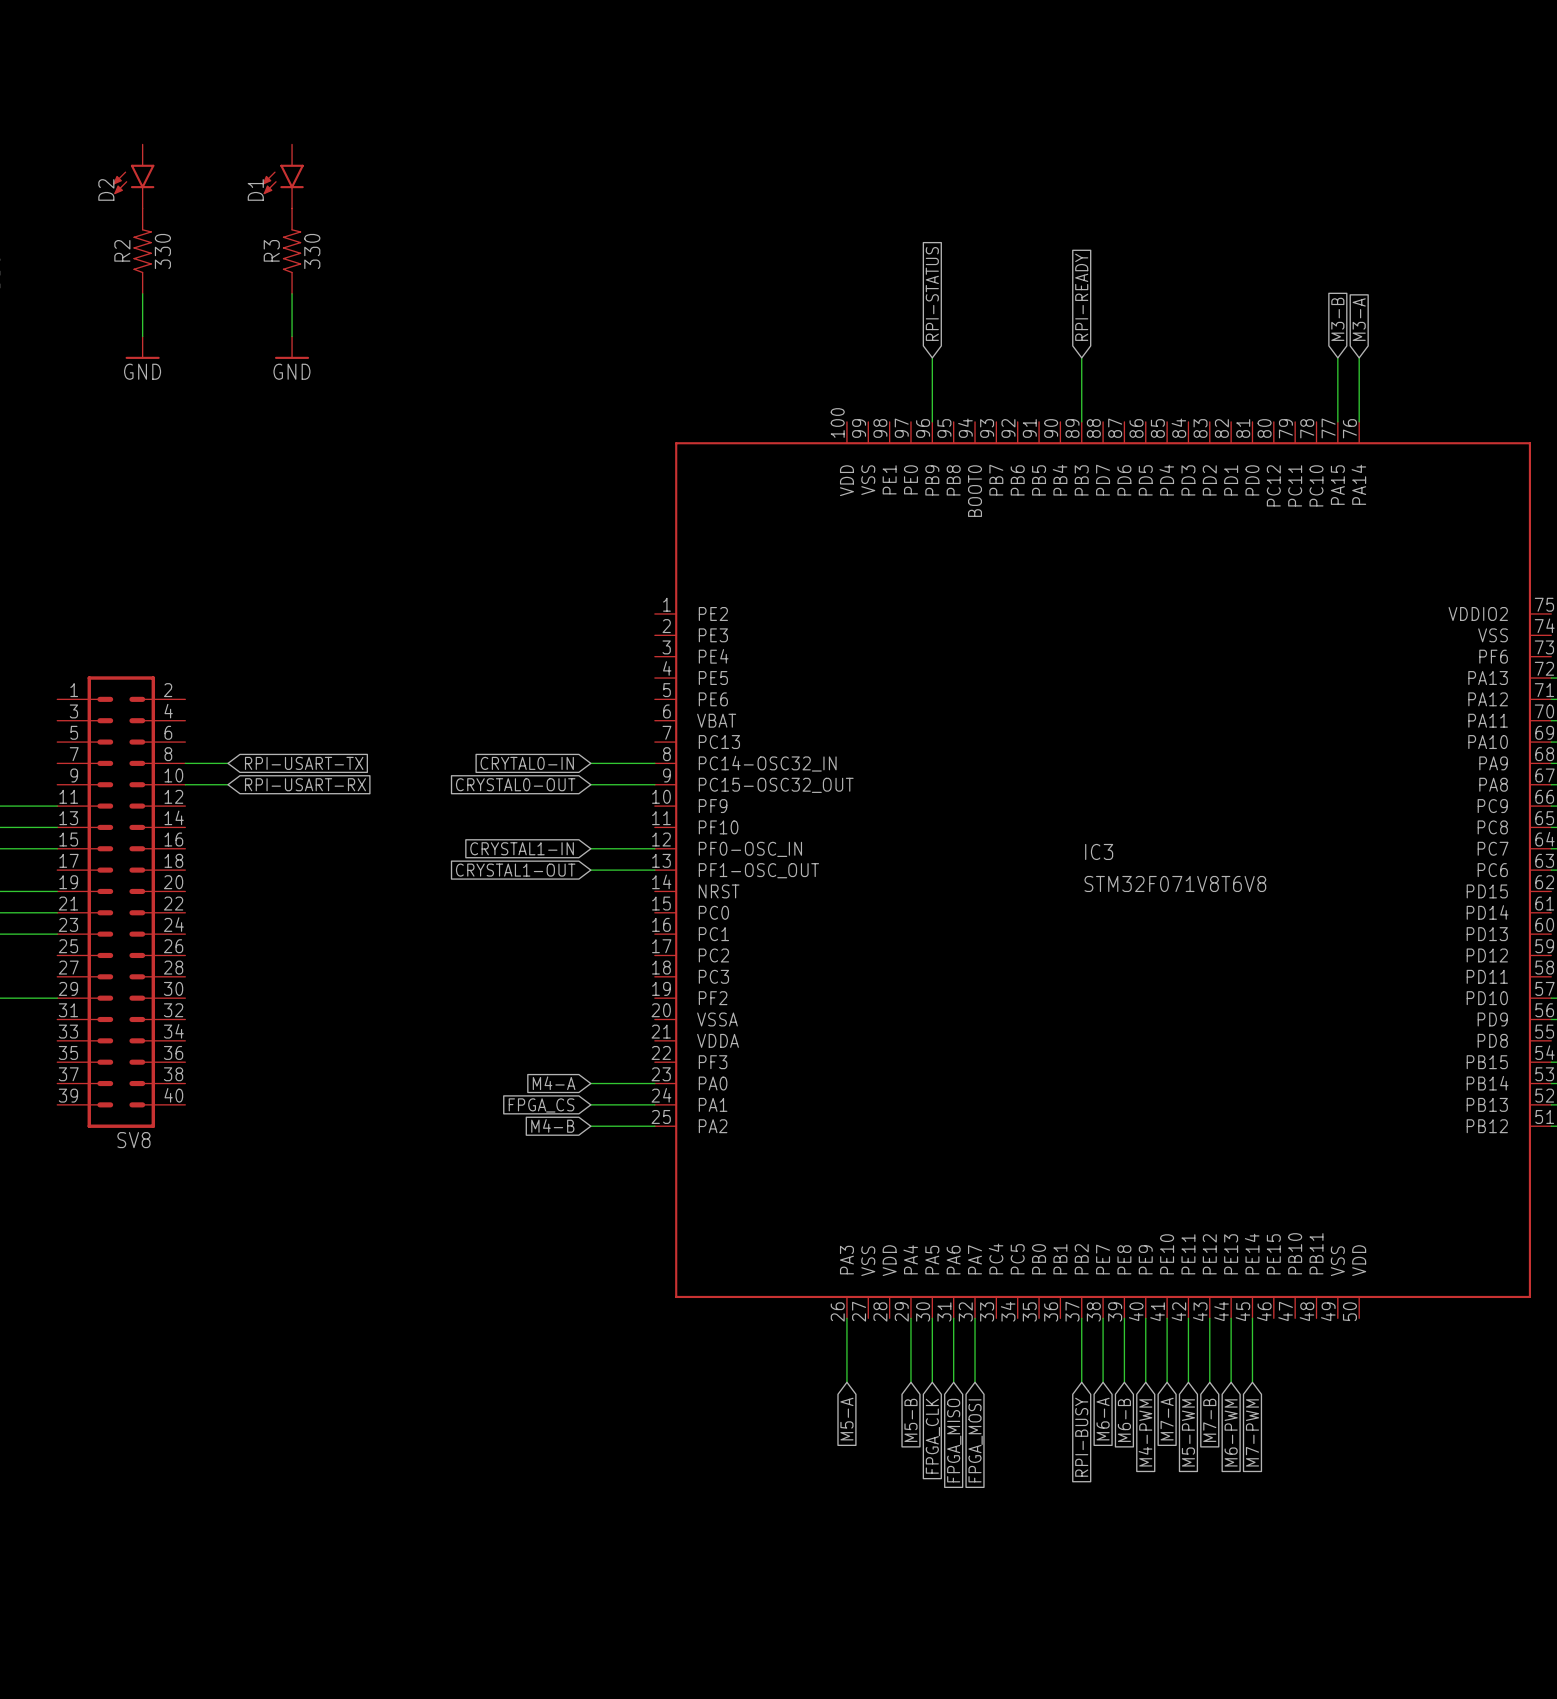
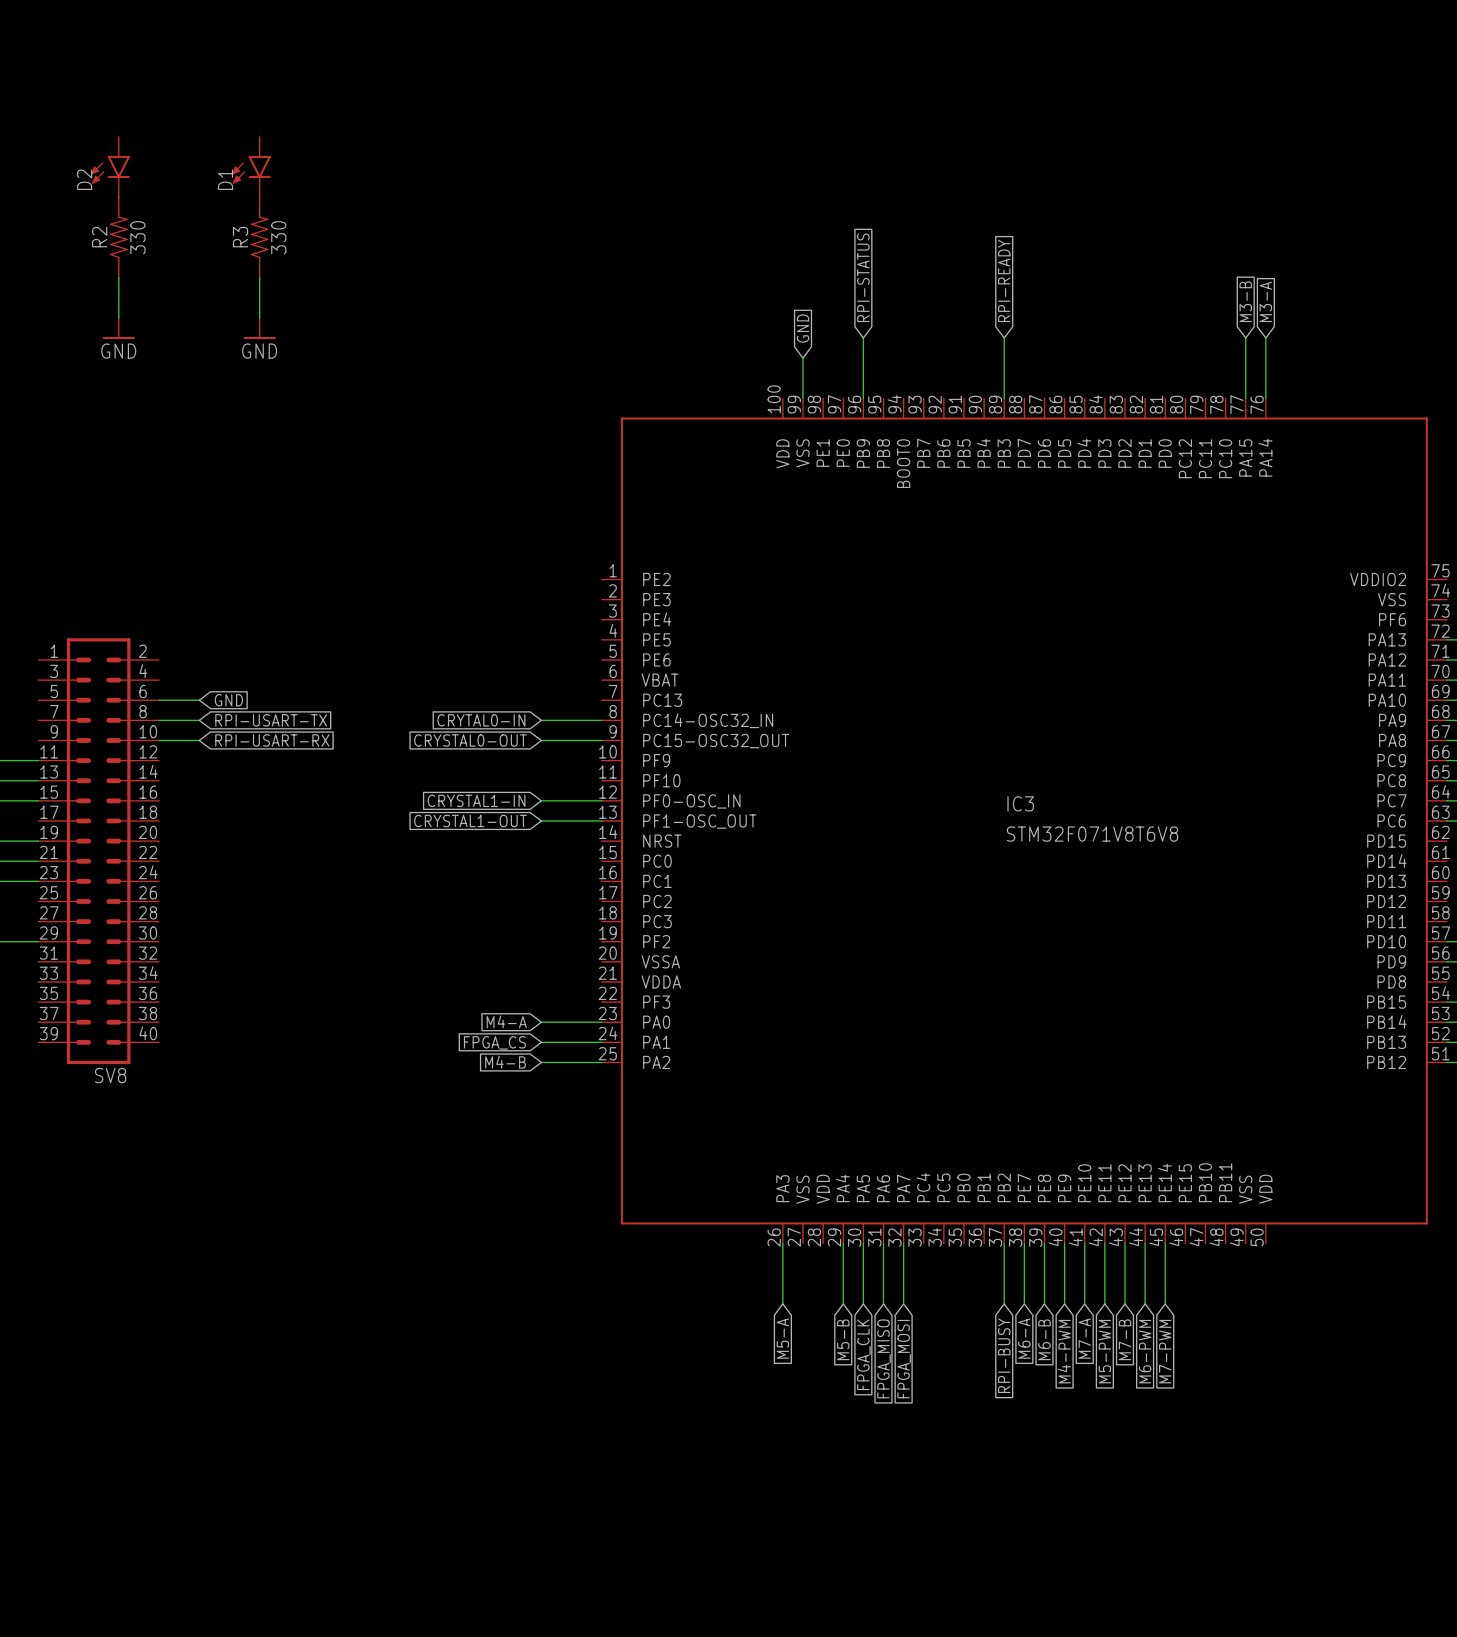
global label: none -> GND (803, 328)
wire: none -> (803, 358) (803, 398)
wire: none -> (159, 700) (199, 700)
global label: none -> GND (228, 700)

